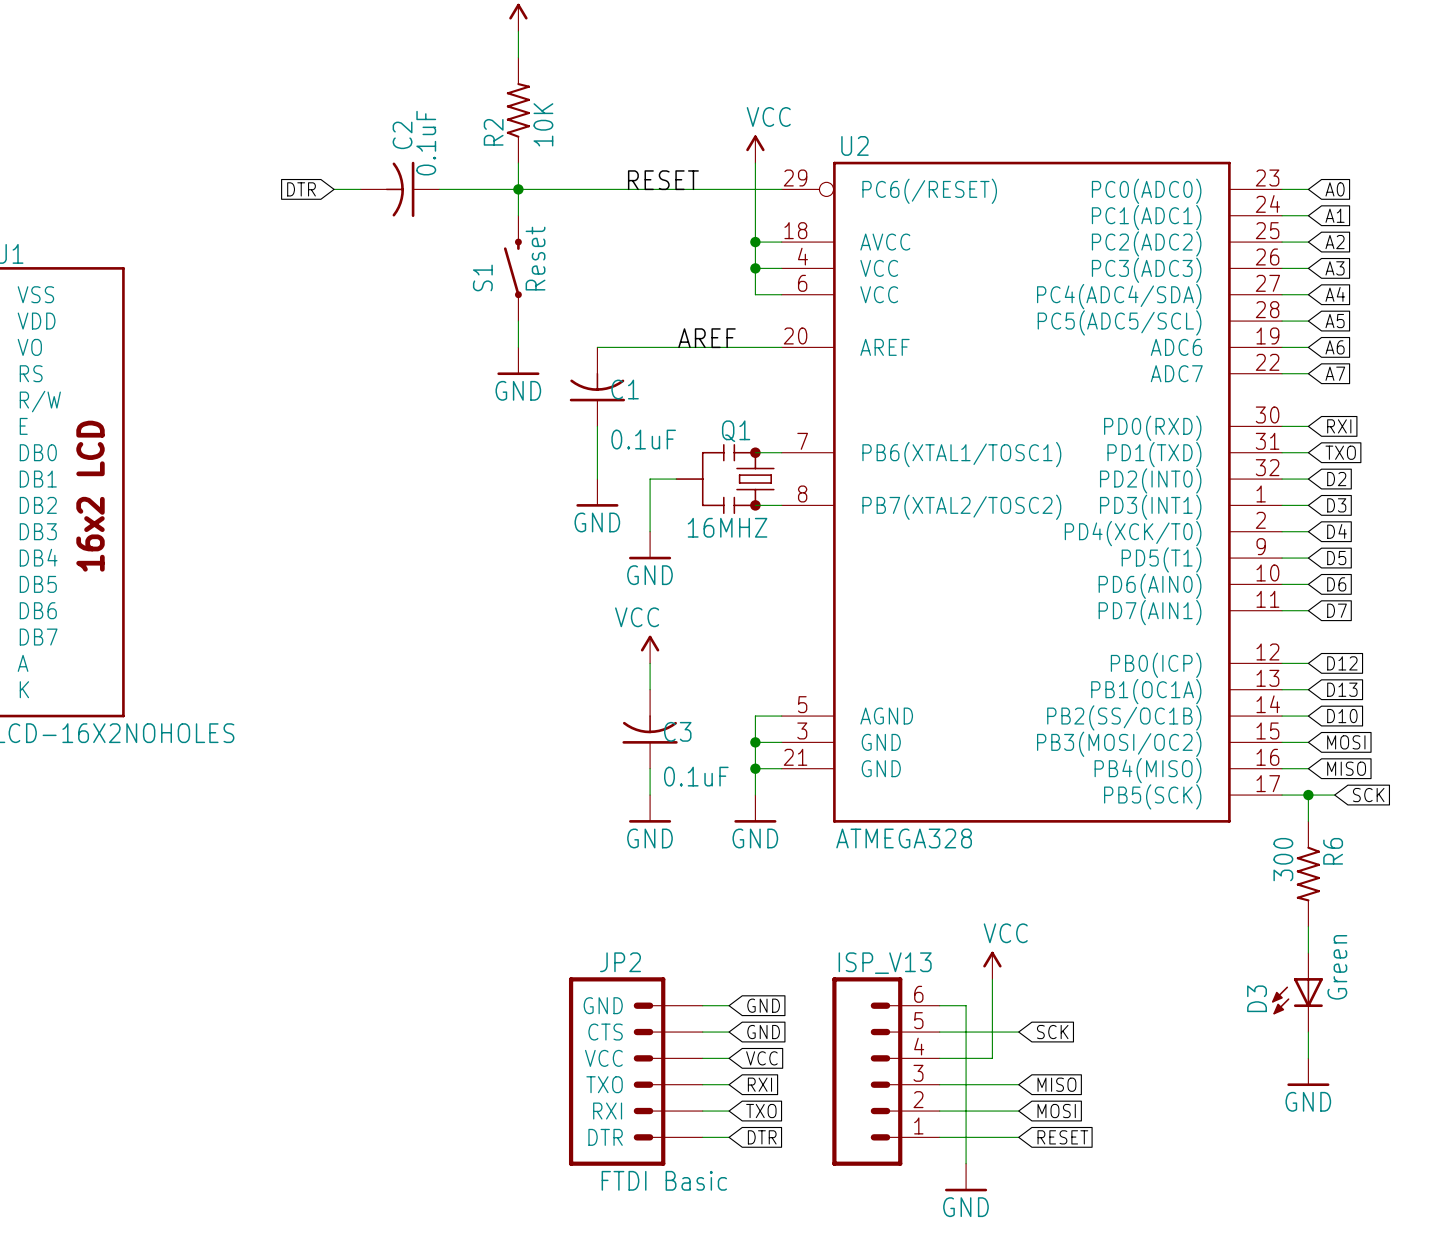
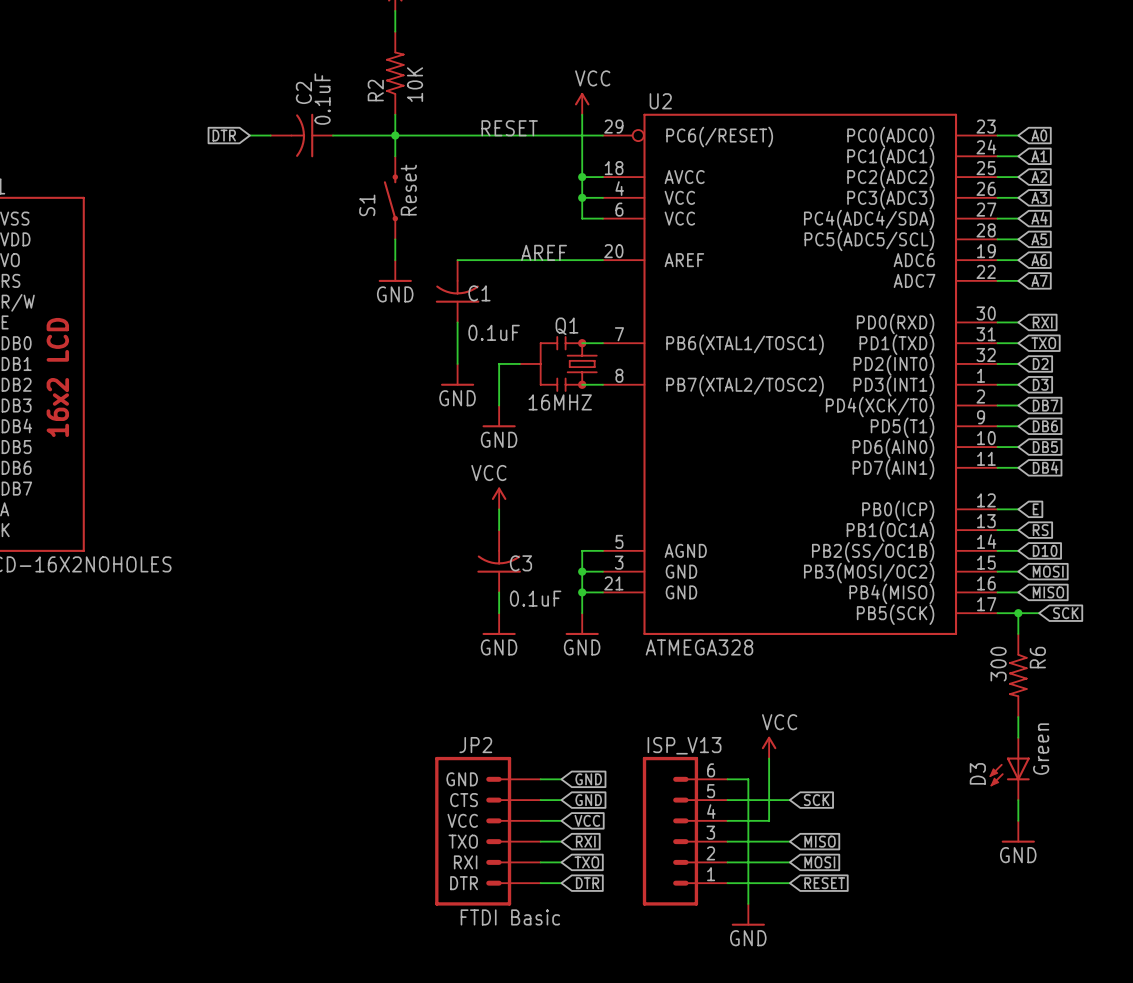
global label: D4 (1337, 531) -> DB7 (1045, 405)
global label: D5 (1336, 558) -> DB6 (1045, 426)
global label: D6 (1336, 584) -> DB5 (1045, 447)
global label: D7 (1337, 610) -> DB4 (1045, 467)
global label: D12 (1342, 663) -> E (1035, 509)
global label: D13 (1342, 689) -> RS (1040, 530)

